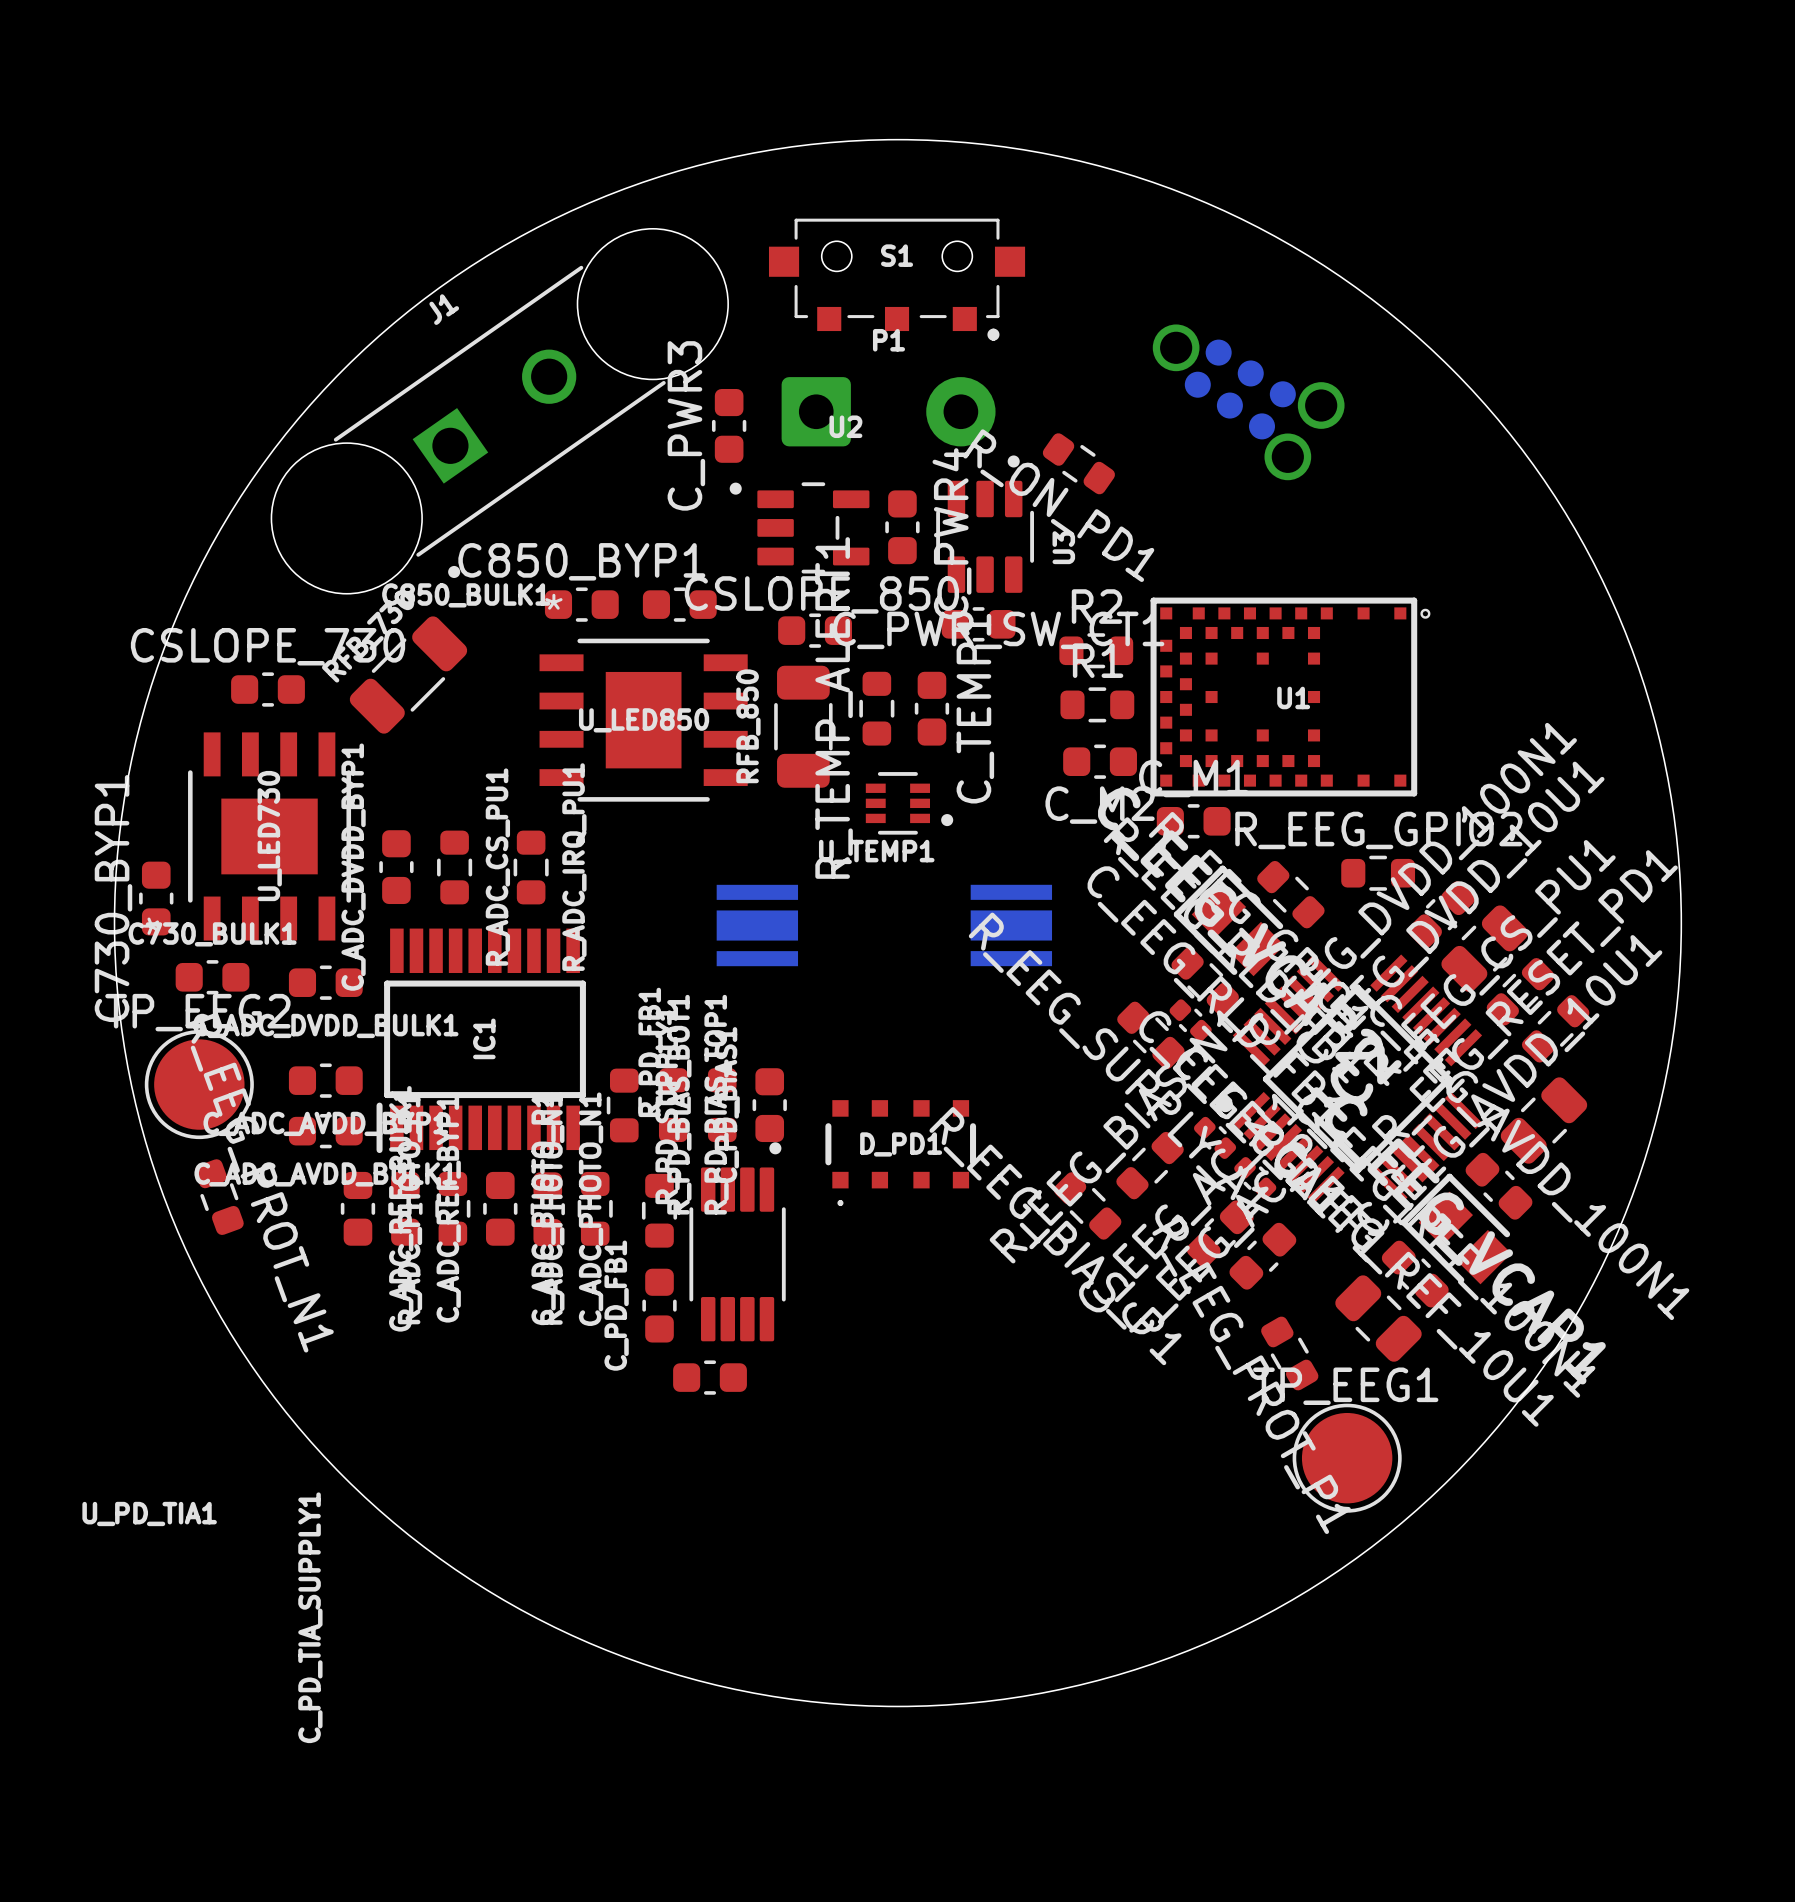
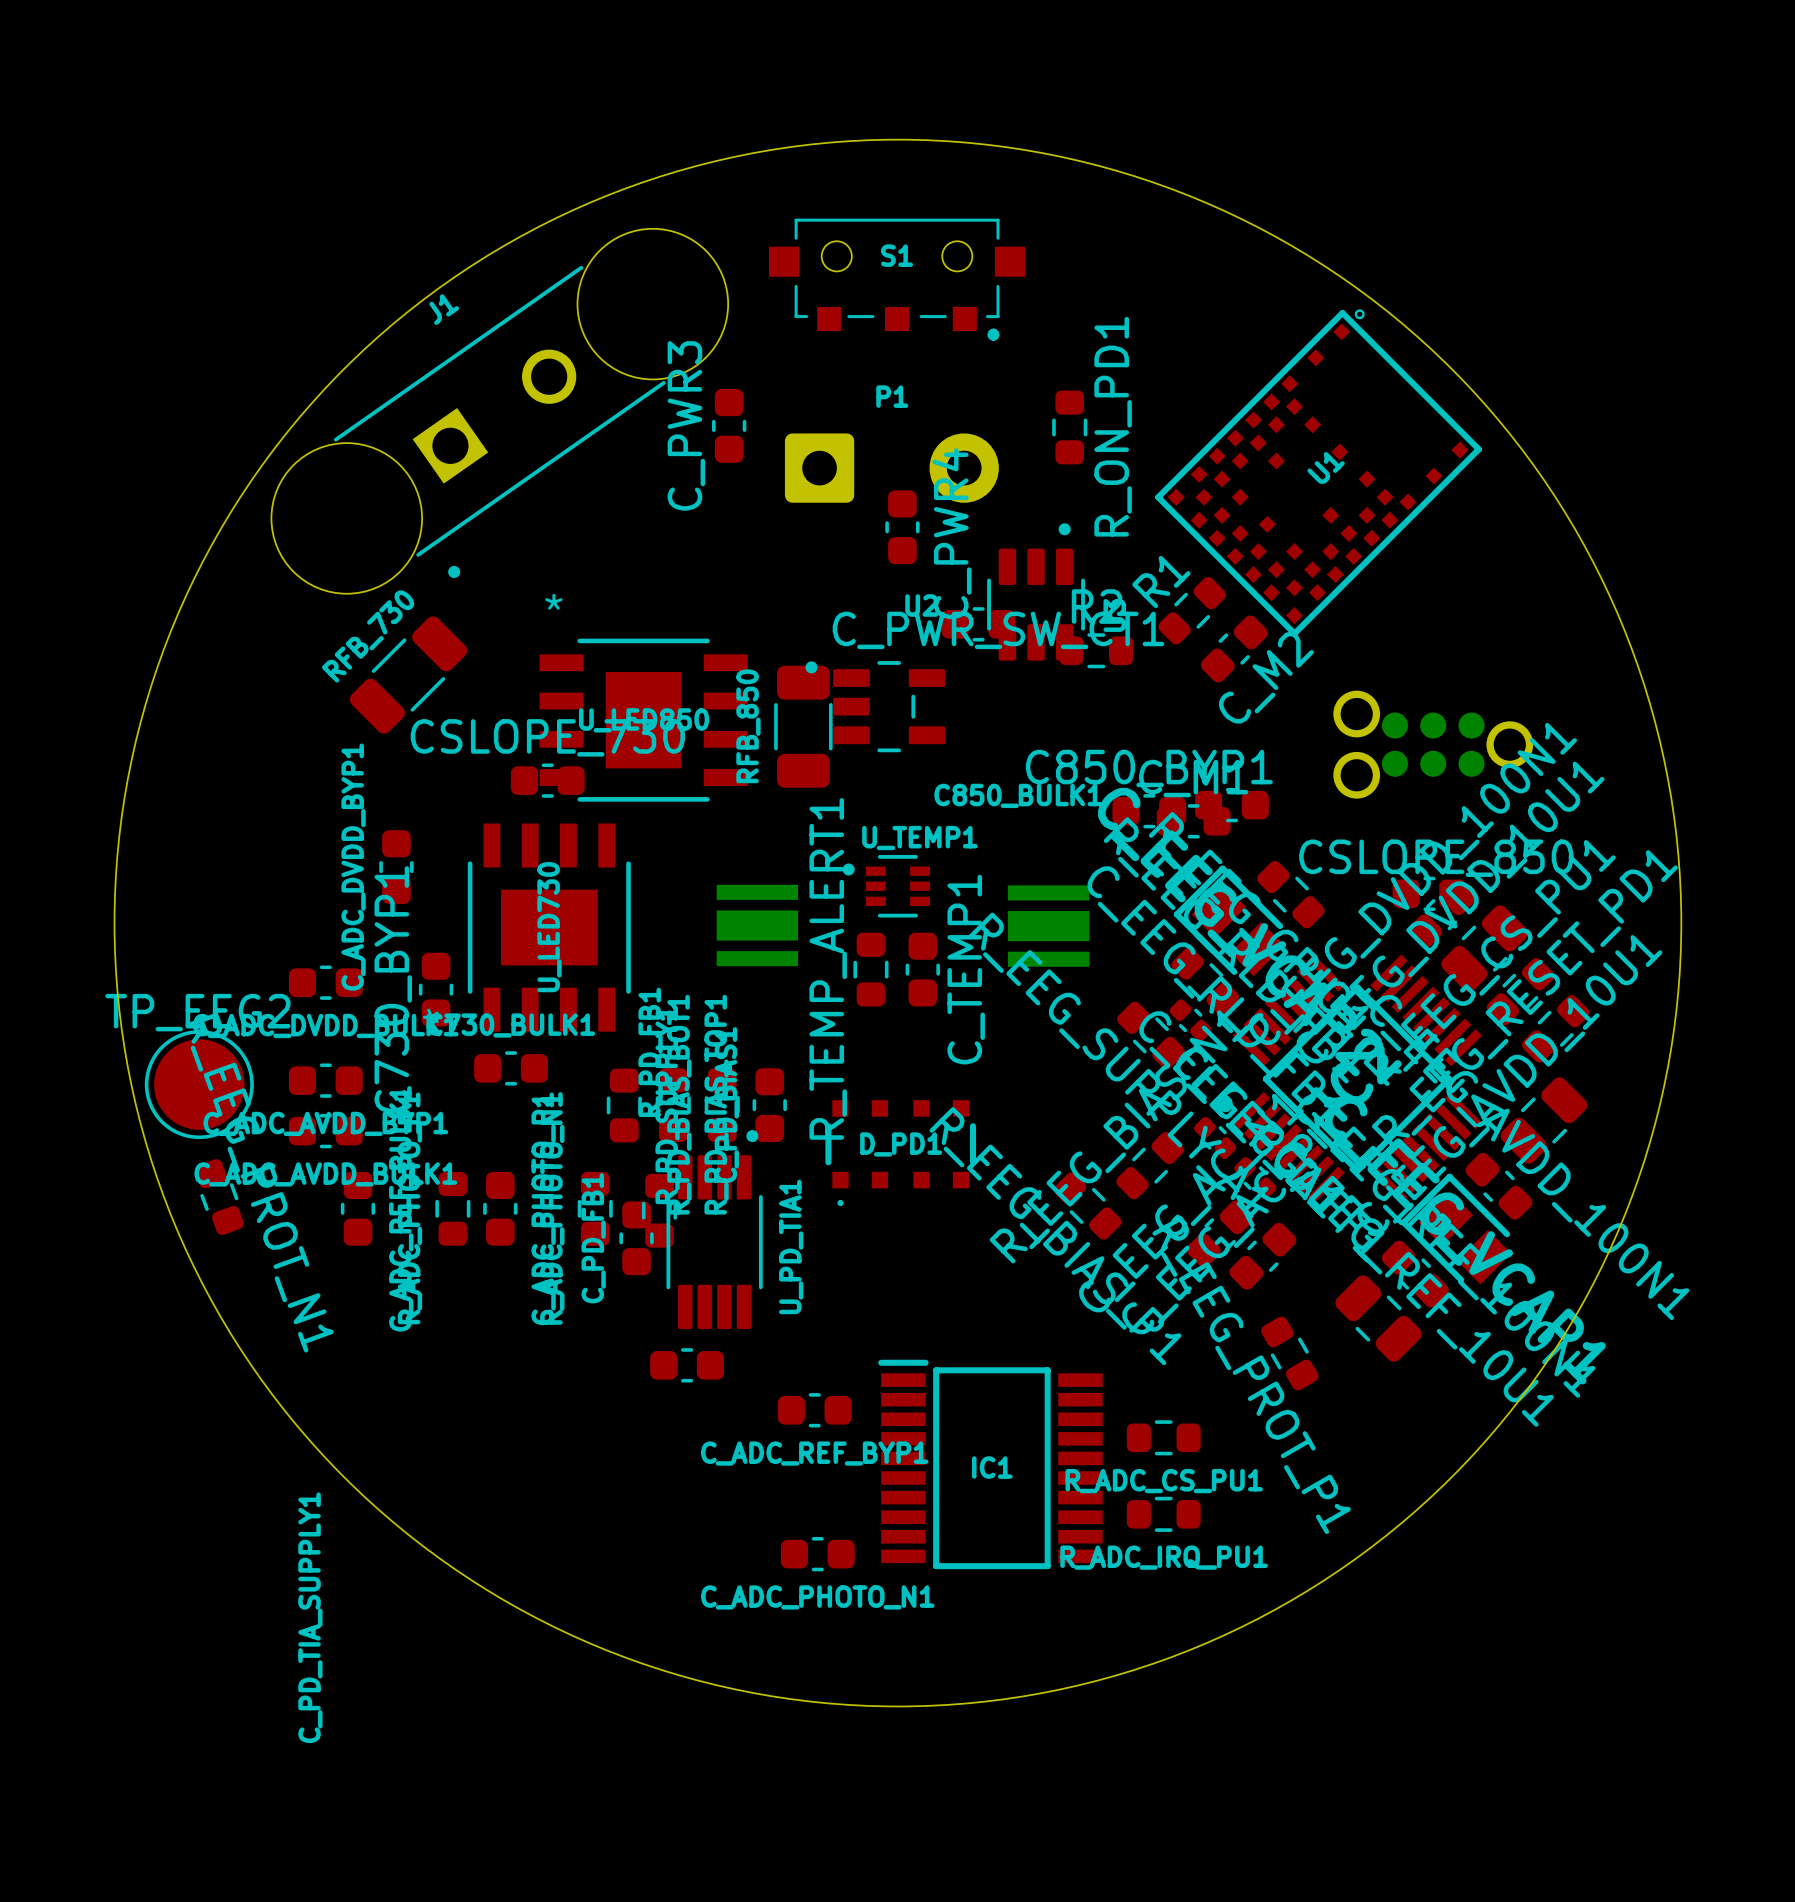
part: (1248, 402) -> none
P1 position: (888, 411) -> (891, 468)
R_ON_PD1 rotation: 0° (1078, 463) -> 55° clockwise (1069, 427)
R_ON_PD1 name position: R_ON_PD1 (1058, 505) -> R_ON_PD1 (1113, 426)
U3 position: (985, 524) -> (1036, 591)
U2 position: (799, 527) -> (875, 706)
C850_BYP1 position: (581, 604) -> (1149, 811)
C850_BULK1 position: (679, 604) -> (1231, 805)
CSLOPE_850 position: (815, 630) -> (1429, 893)
CSLOPE_730 position: (268, 689) -> (547, 780)
U1 rotation: 0° (1290, 697) -> 45° counterclockwise (1318, 472)
U1 position: (1290, 697) -> (1318, 472)
R1 rotation: 0° (1097, 704) -> 45° counterclockwise (1192, 610)
R1 position: (1097, 704) -> (1192, 610)
R_TEMP_ALERT1 position: (876, 708) -> (870, 969)
C_TEMP1 position: (931, 708) -> (922, 969)
part: none -> (1433, 744)
C_M2 rotation: 0° (1100, 761) -> 45° counterclockwise (1234, 648)
C_M2 position: (1100, 761) -> (1234, 648)
U_TEMP1 rotation: 0° (909, 803) -> 180° (886, 886)
U_TEMP1 position: (909, 803) -> (886, 886)
U_LED730 position: (269, 836) -> (549, 927)
R_ADC_CS_PU1 rotation: 0° (454, 867) -> 90° clockwise (1163, 1437)
R_ADC_CS_PU1 position: (454, 867) -> (1163, 1437)
R_ADC_IRQ_PU1 rotation: 0° (531, 867) -> 90° clockwise (1163, 1514)
R_ADC_IRQ_PU1 position: (531, 867) -> (1163, 1514)
R_EEG_GPIO2: (1378, 873) -> none
C730_BYP1 position: (156, 898) -> (436, 989)
part position: (1011, 925) -> (1048, 926)
C730_BULK1 position: (212, 977) -> (511, 1068)
IC1 rotation: 0° (481, 1040) -> 90° clockwise (990, 1464)
IC1 position: (481, 1040) -> (990, 1464)
C_ADC_REF_BYP1 rotation: 0° (405, 1208) -> 90° clockwise (814, 1410)
C_ADC_REF_BYP1 position: (405, 1208) -> (814, 1410)
C_ADC_PHOTO_N1 rotation: 0° (547, 1209) -> 90° clockwise (817, 1554)
C_ADC_PHOTO_N1 position: (547, 1209) -> (817, 1554)
U_PD_TIA1 position: (737, 1241) -> (714, 1229)
C_PD_FB1 position: (659, 1305) -> (636, 1238)
C_PD_TIA_SUPPLY1 position: (710, 1377) -> (687, 1365)
TP_EEG1: (1347, 1458) -> none
U_PD_TIA1 name rotation: 0° (149, 1513) -> 90° counterclockwise (791, 1246)
U_PD_TIA1 name position: U_PD_TIA1 (149, 1513) -> U_PD_TIA1 (791, 1246)

